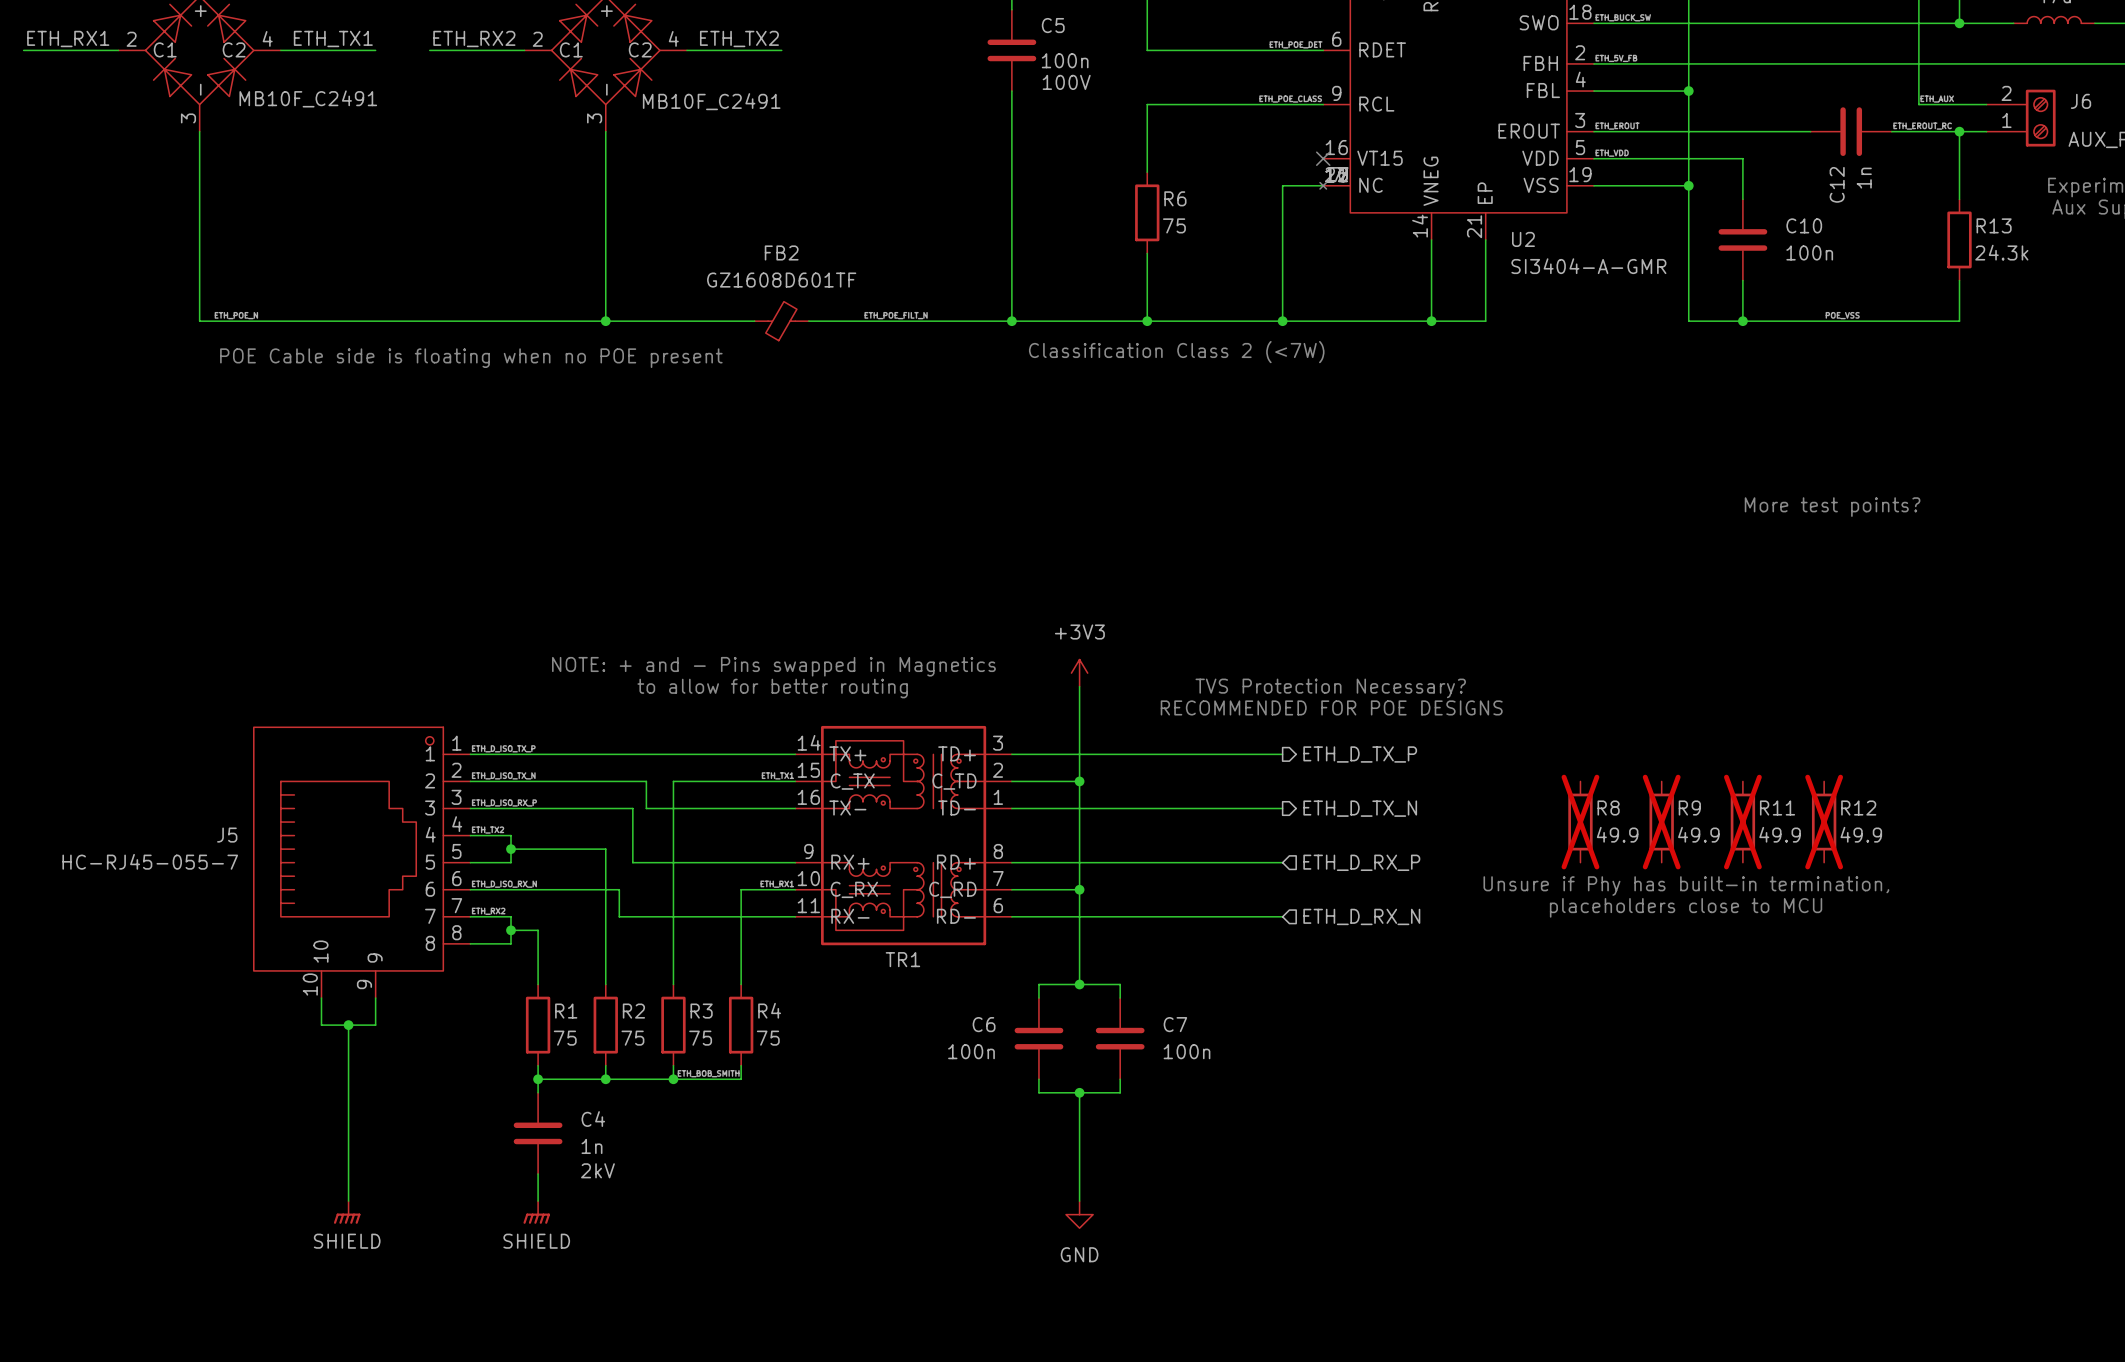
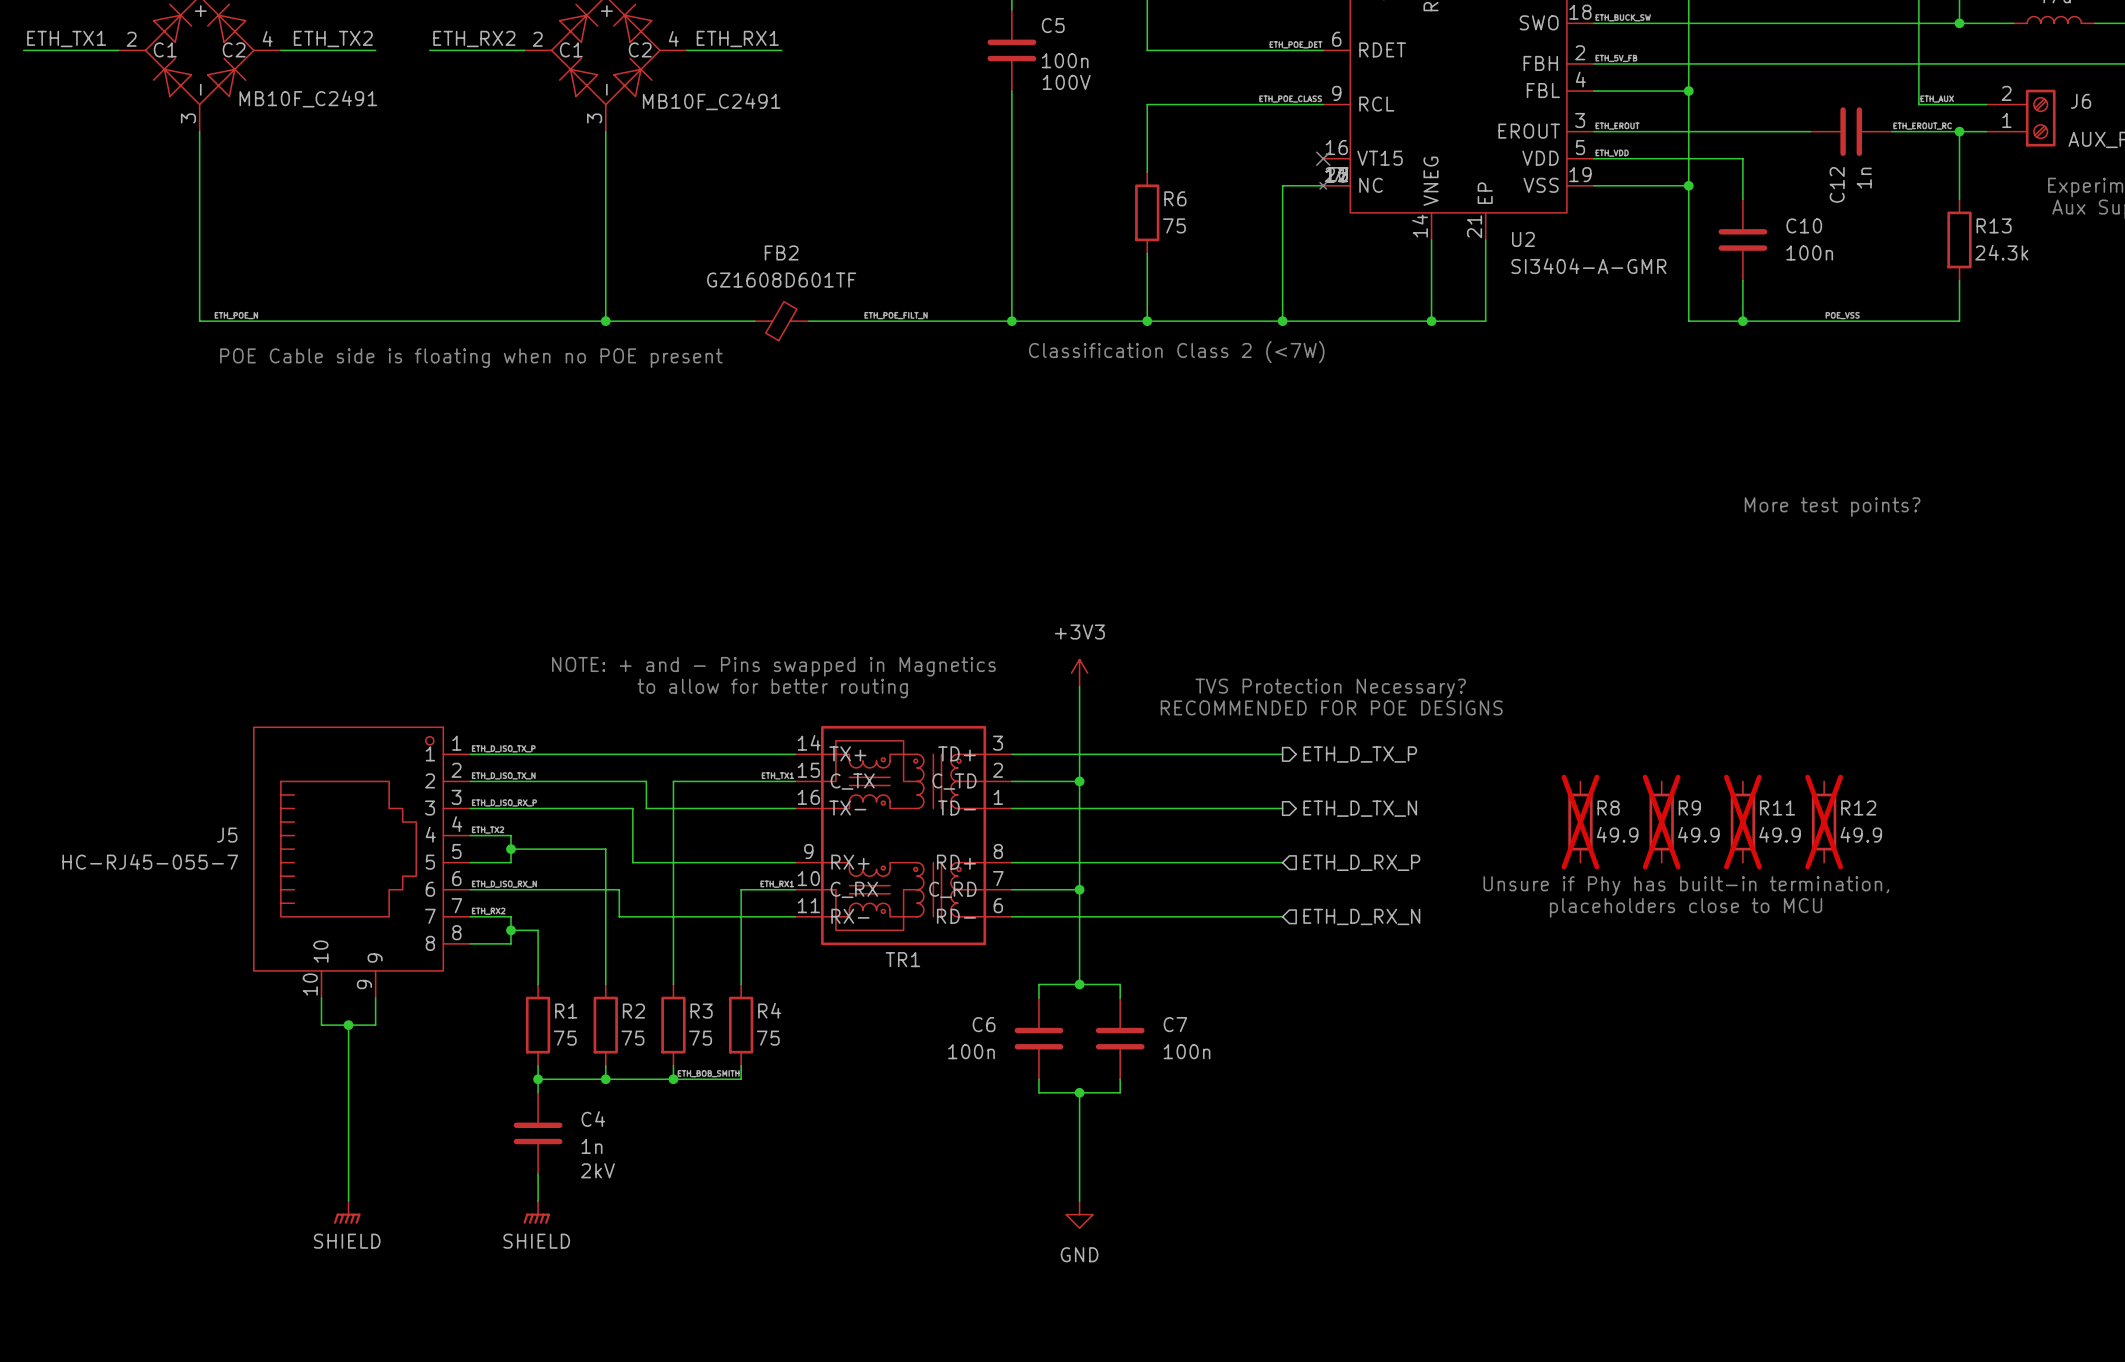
label: ETH_RX1 (68, 38) -> ETH_TX1 (66, 38)
label: ETH_TX1 (333, 38) -> ETH_TX2 (333, 38)
label: ETH_TX2 (739, 38) -> ETH_RX1 (737, 38)

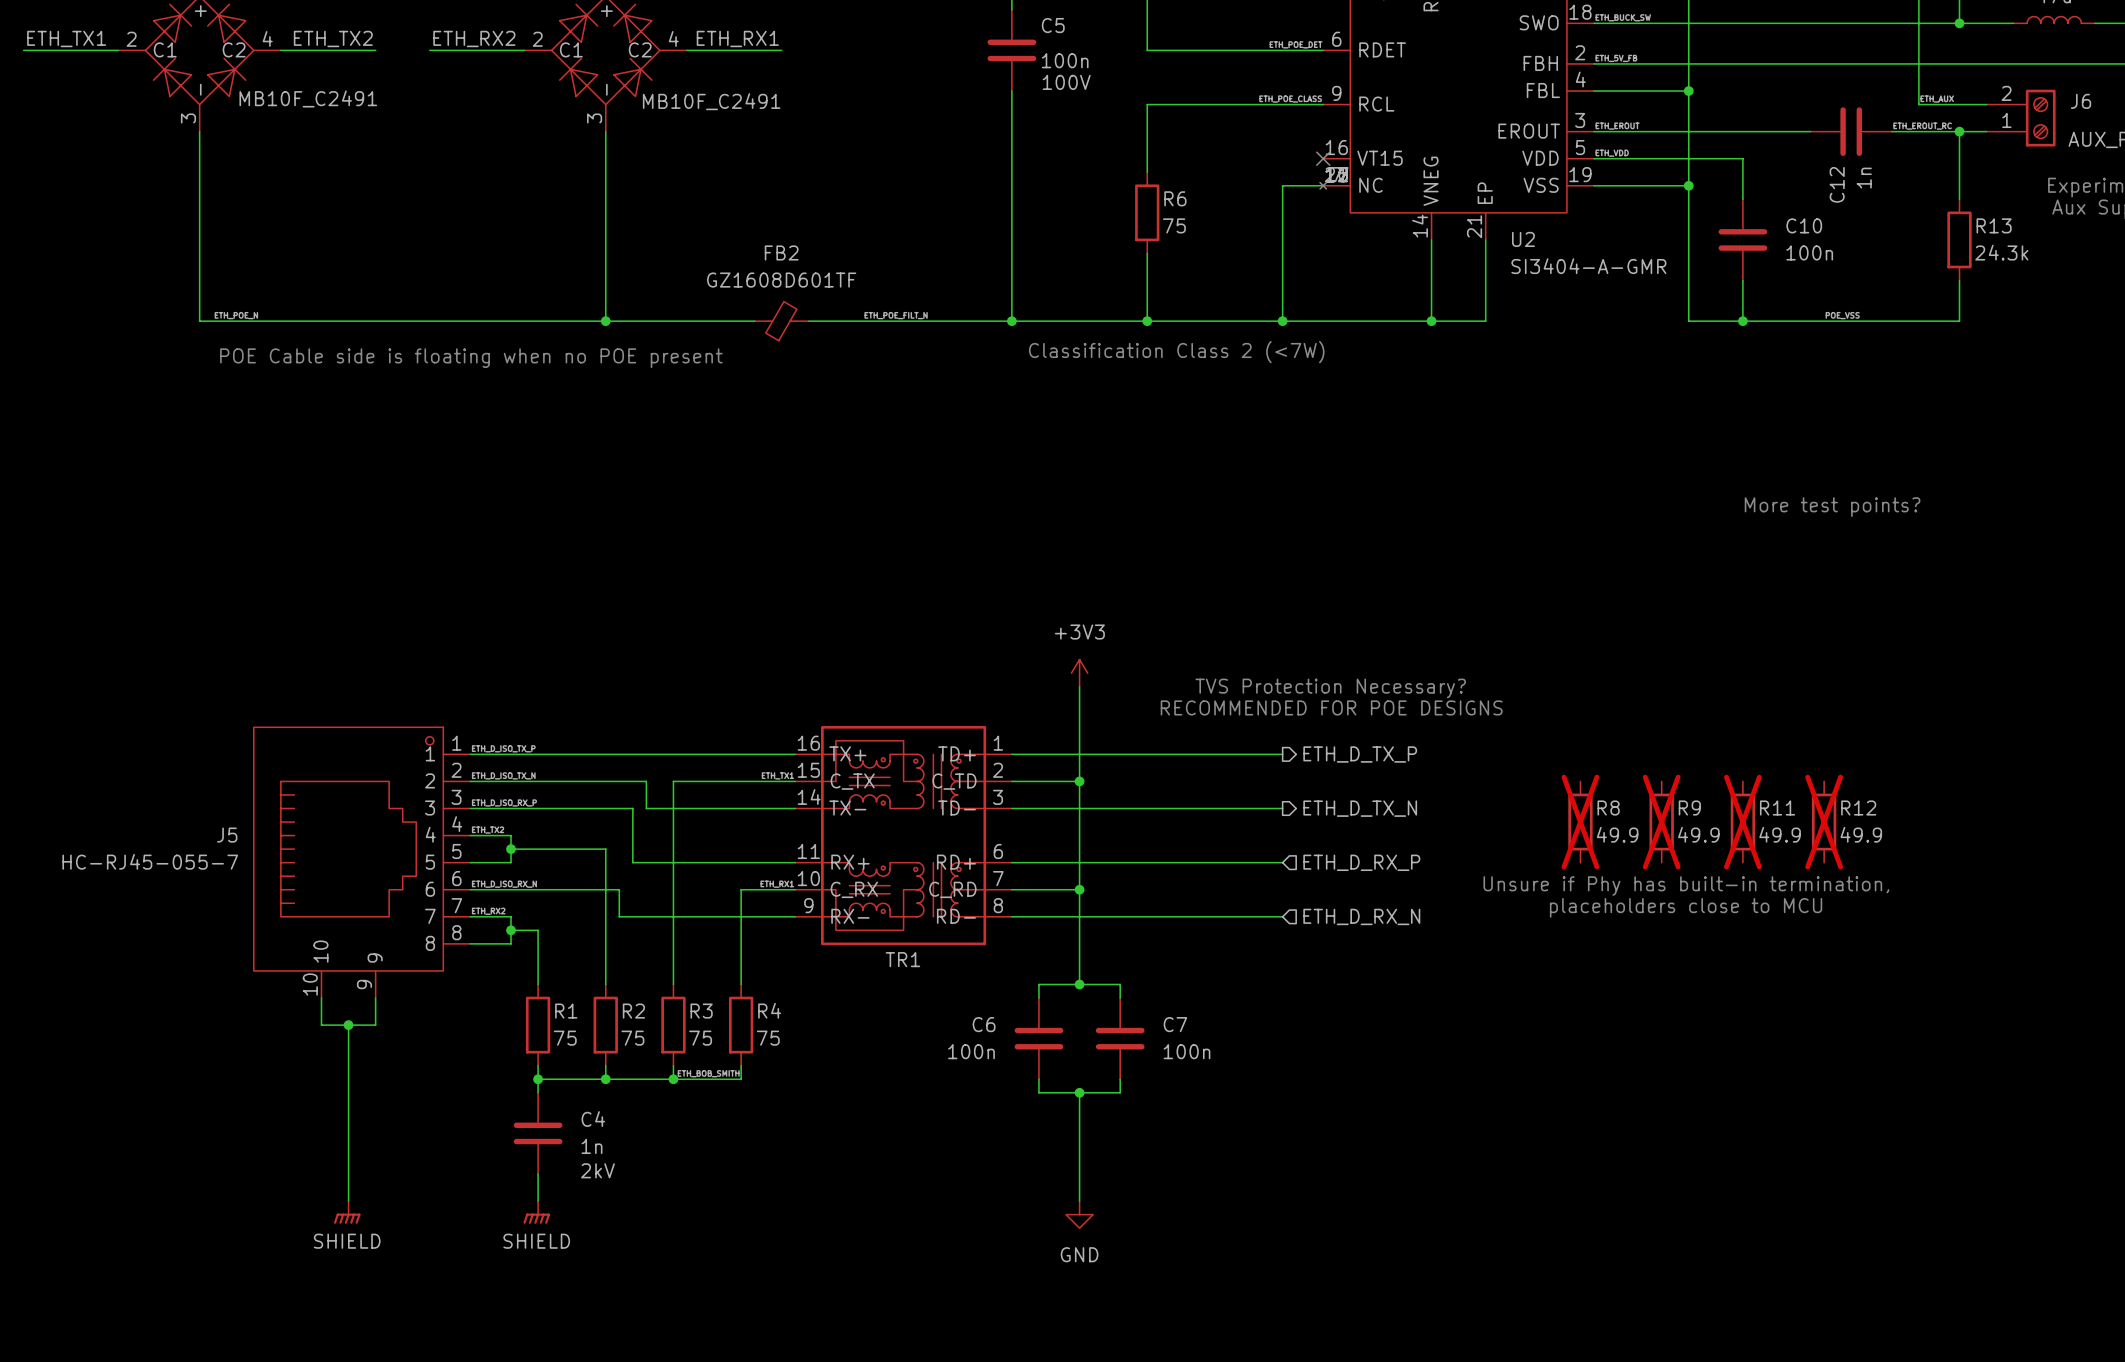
text: NOTE: + and - Pins swapped in Magnetics (773, 666) -> none
text: to allow for better routing (772, 688) -> none
TR1 pin number: 14 (809, 742) -> 16 (808, 743)
TR1 pin number: 3 (998, 743) -> 1 (998, 743)
TR1 pin number: 16 (808, 797) -> 14 (809, 797)
TR1 pin number: 1 (998, 797) -> 3 (998, 797)
TR1 pin number: 9 (808, 851) -> 11 (808, 851)
TR1 pin number: 8 (998, 851) -> 6 (998, 851)
TR1 pin number: 11 (808, 905) -> 9 (808, 905)
TR1 pin number: 6 (998, 905) -> 8 (998, 905)

